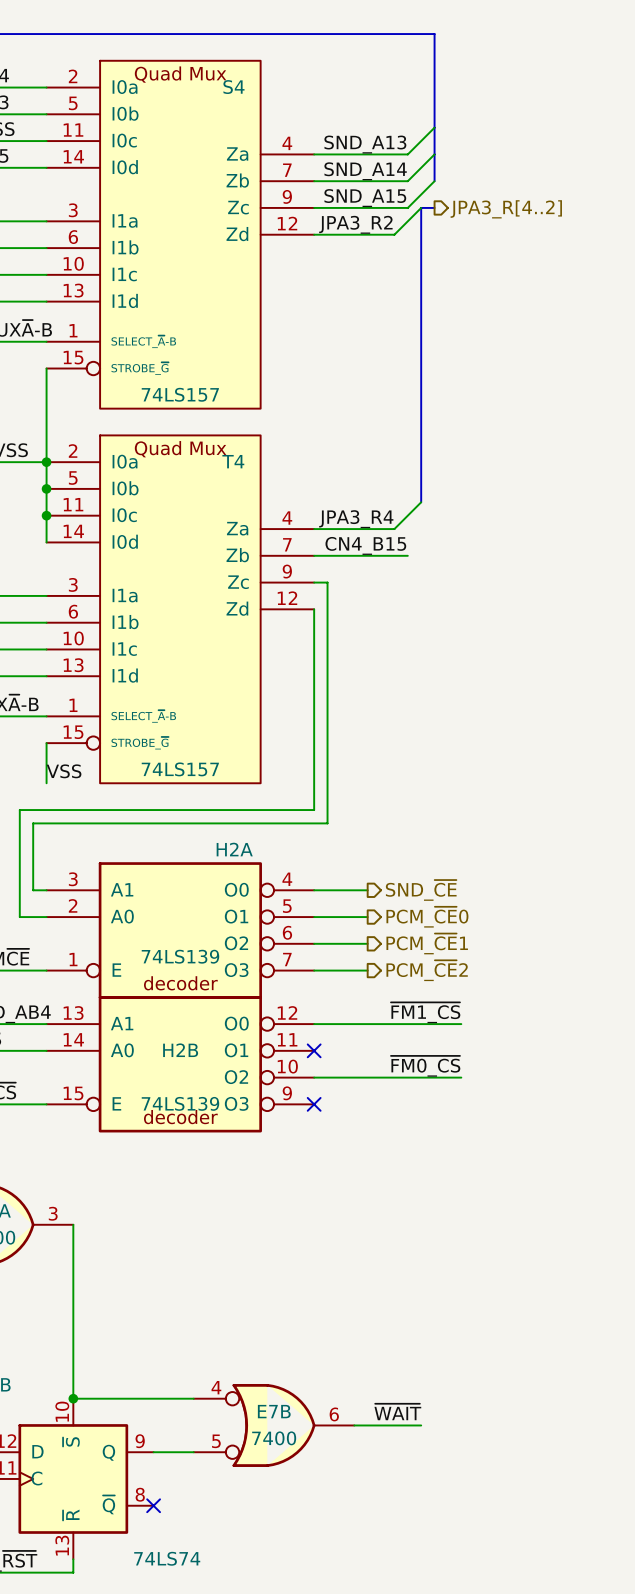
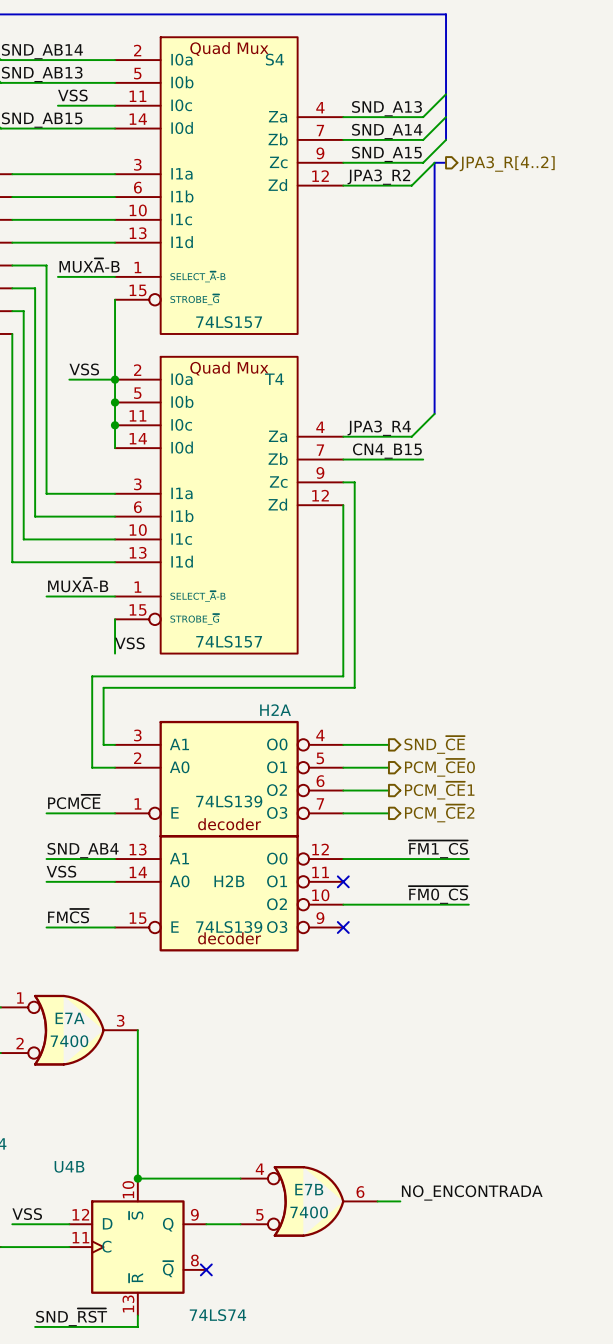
label: ~{WAIT} (397, 1411) -> none
label: none -> NO_ENCONTRADA (472, 1192)
wire: (381, 1425) (421, 1425) -> none

